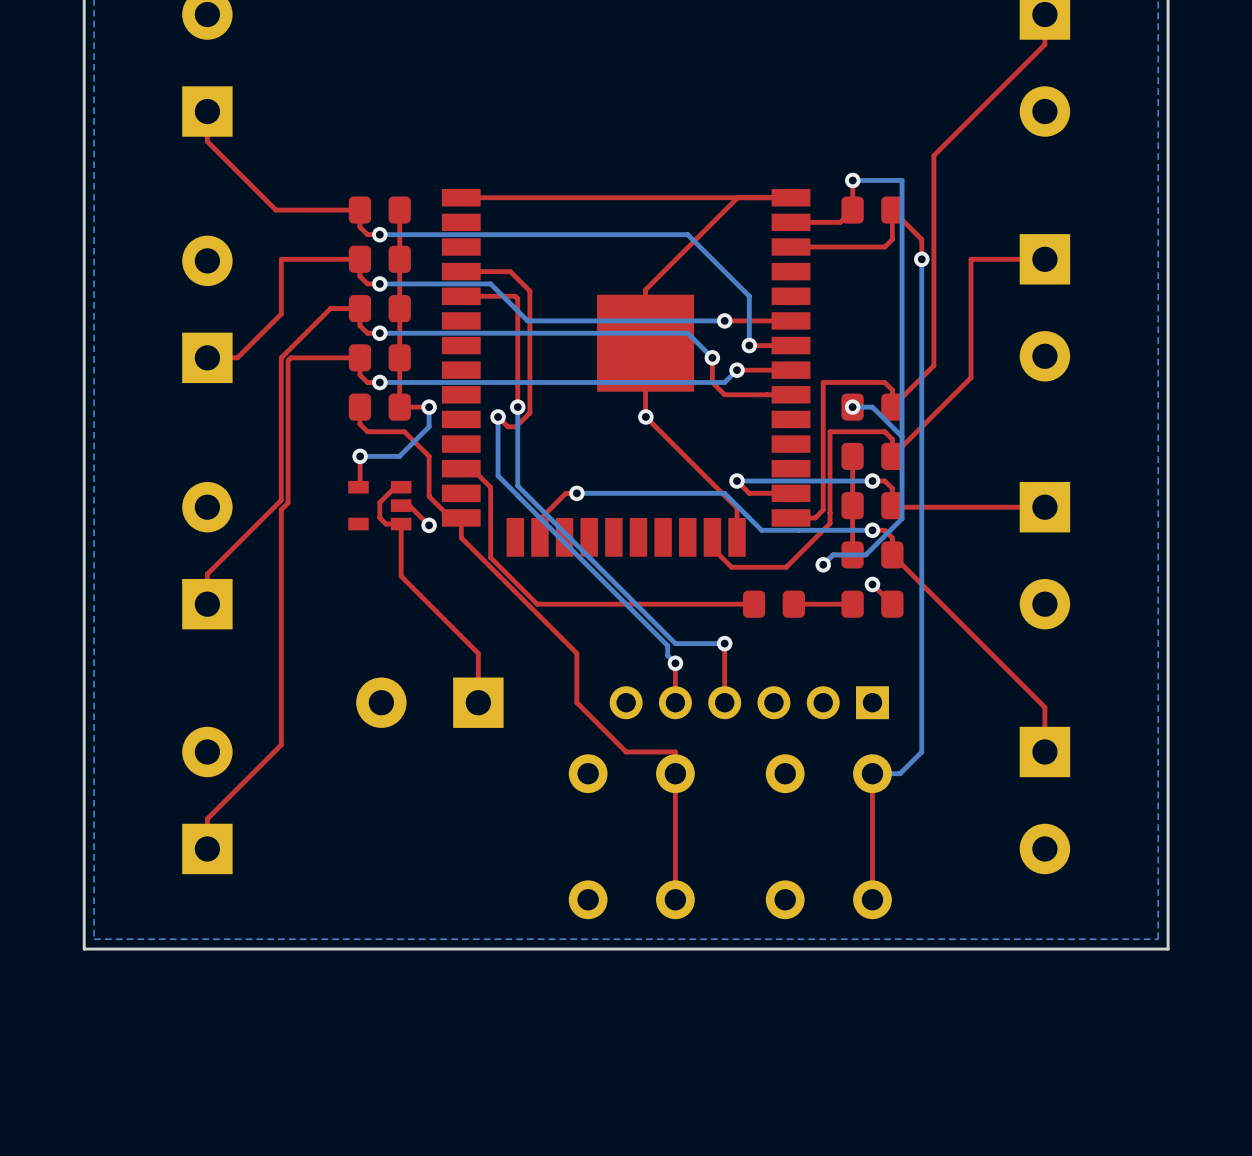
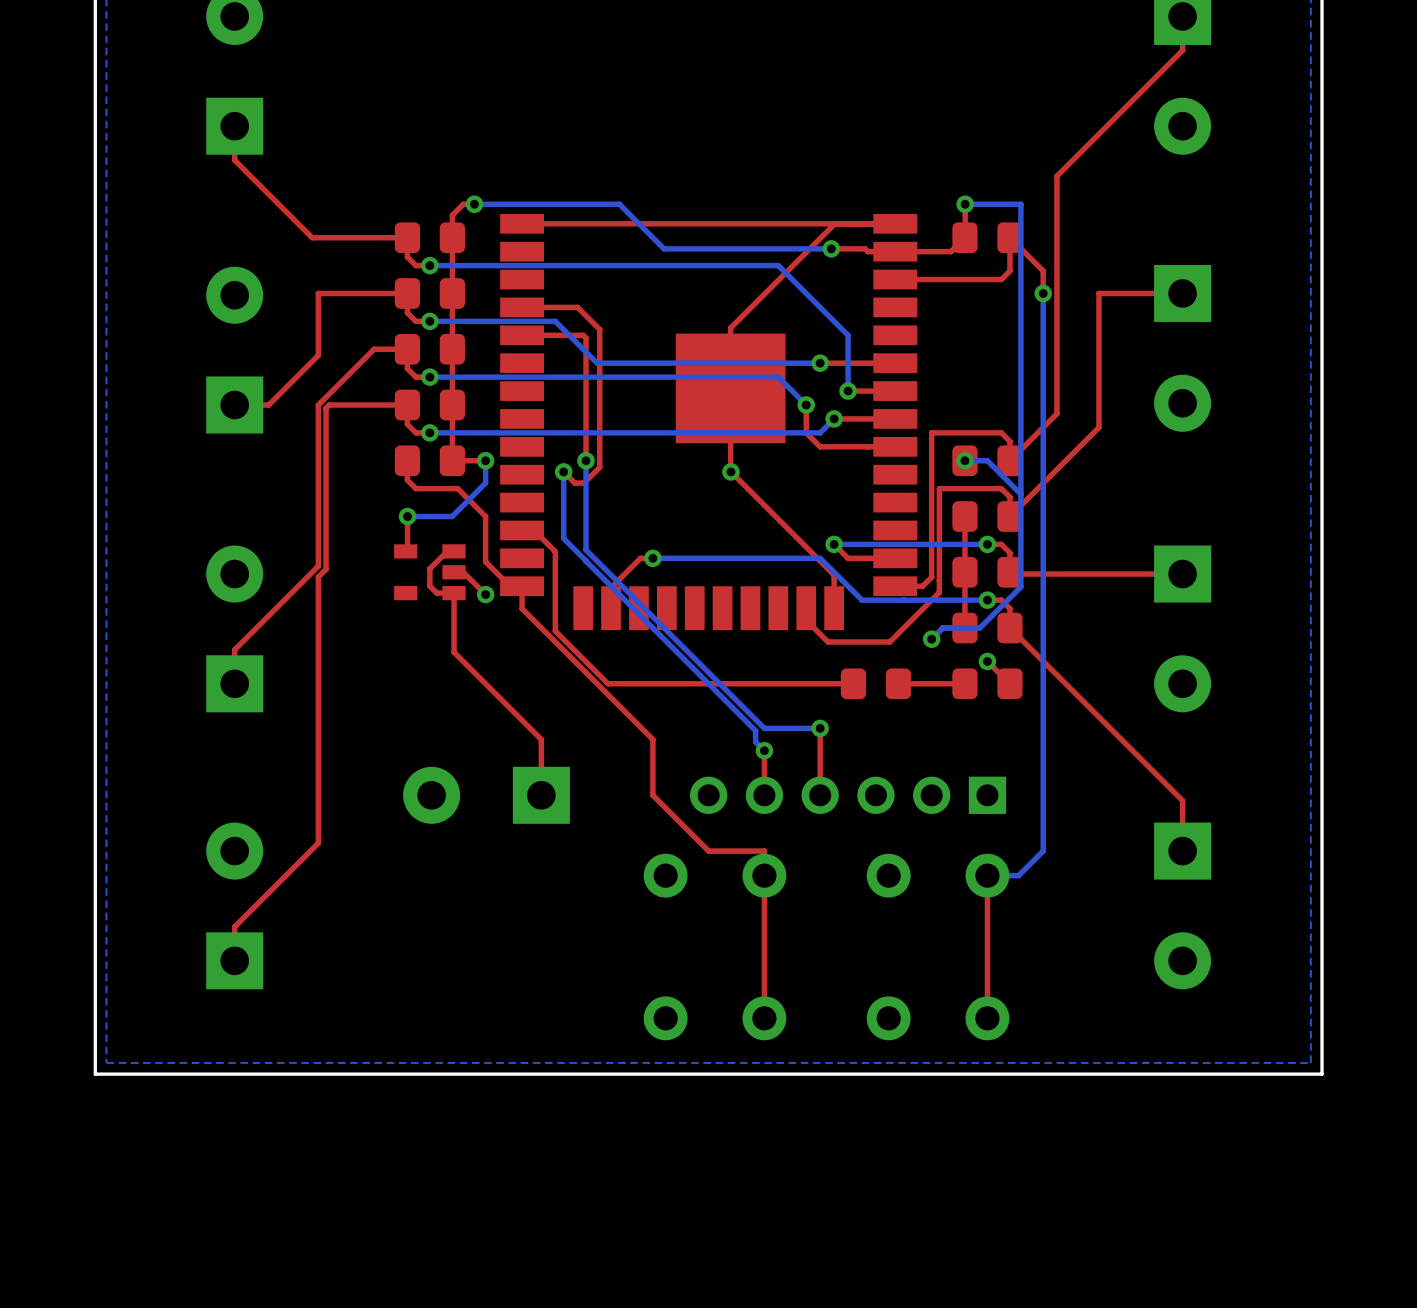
top track: none -> (474, 204) (463, 204) (452, 215) (452, 237)
bottom track: none -> (474, 204) (619, 204) (664, 248) (831, 248)
via: none -> (474, 204)
top track: none -> (831, 248) (895, 251)
via: none -> (831, 248)

